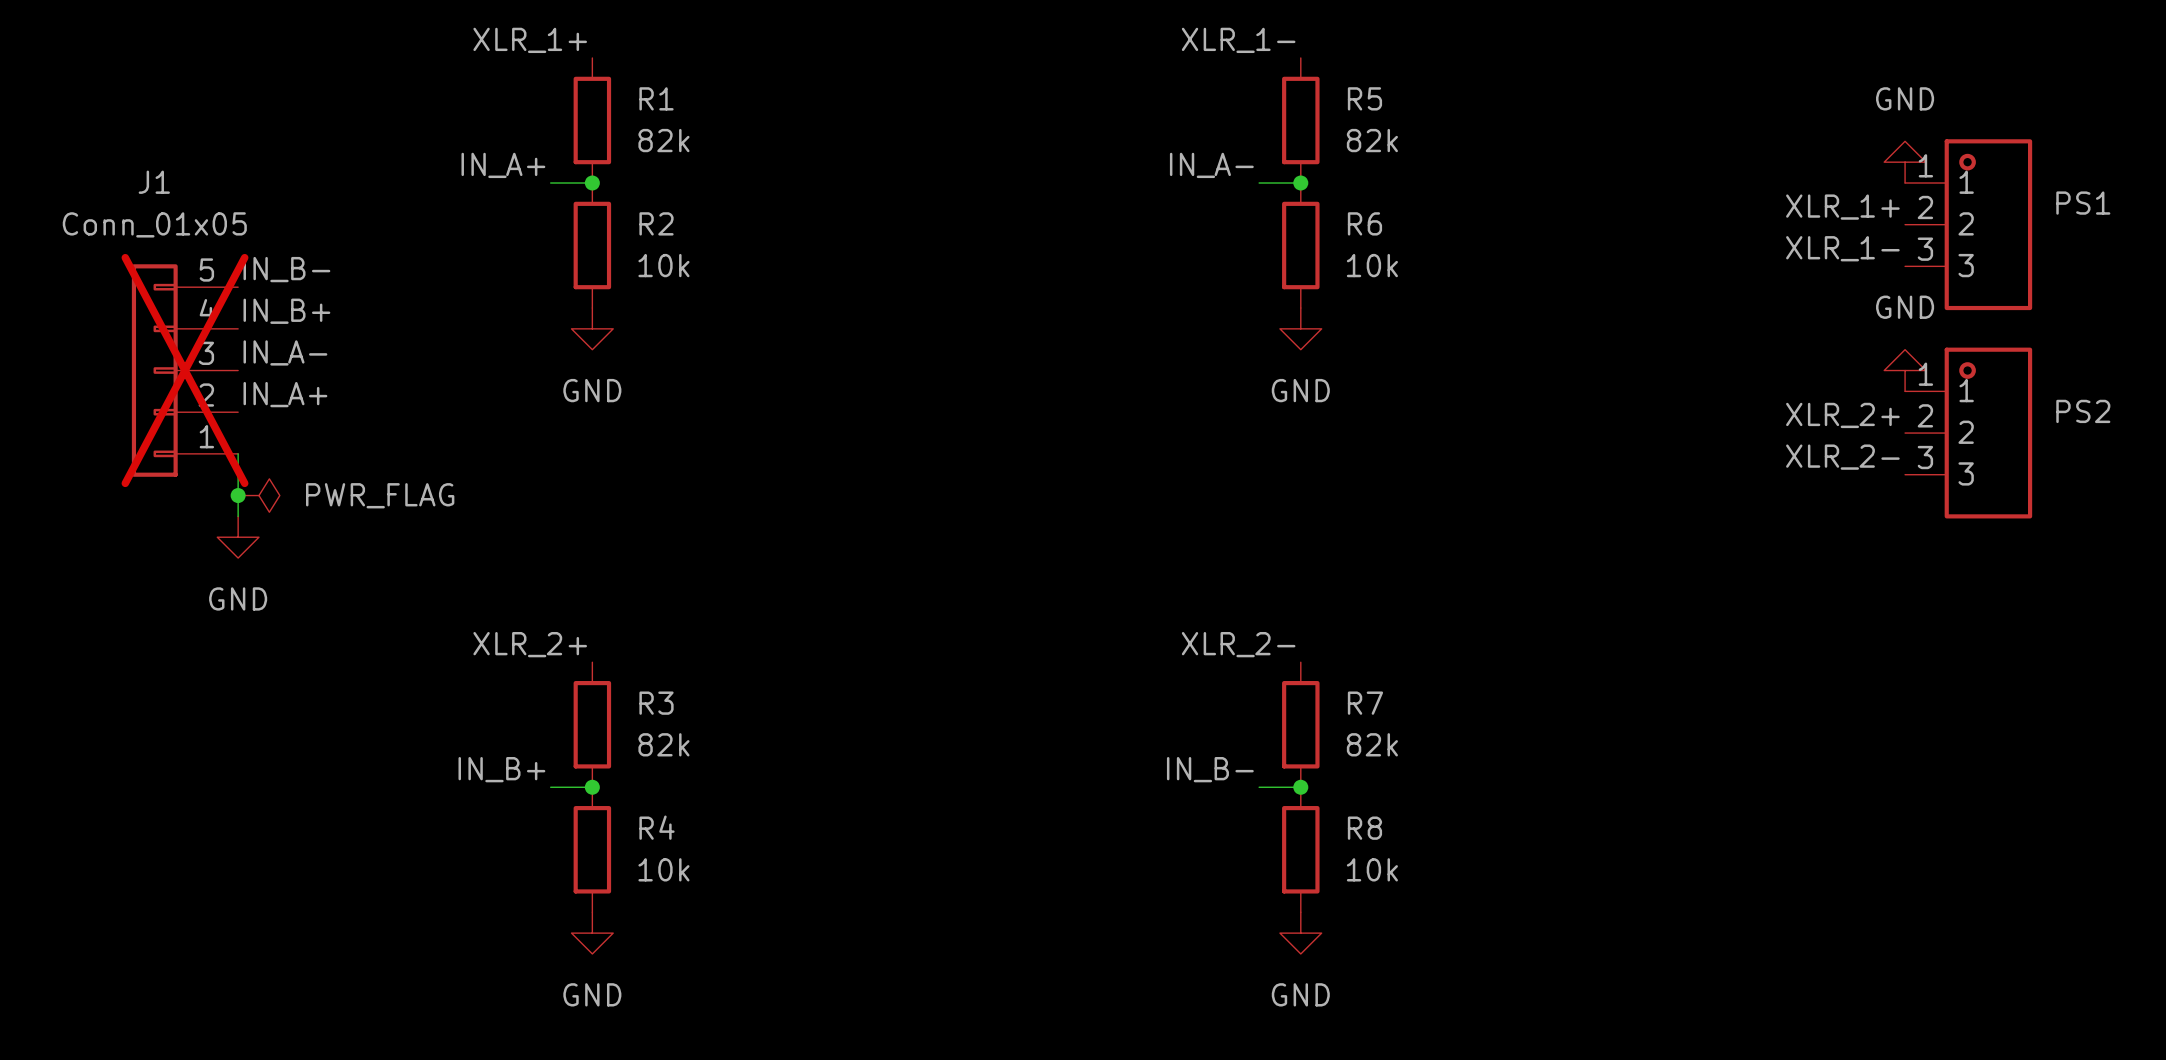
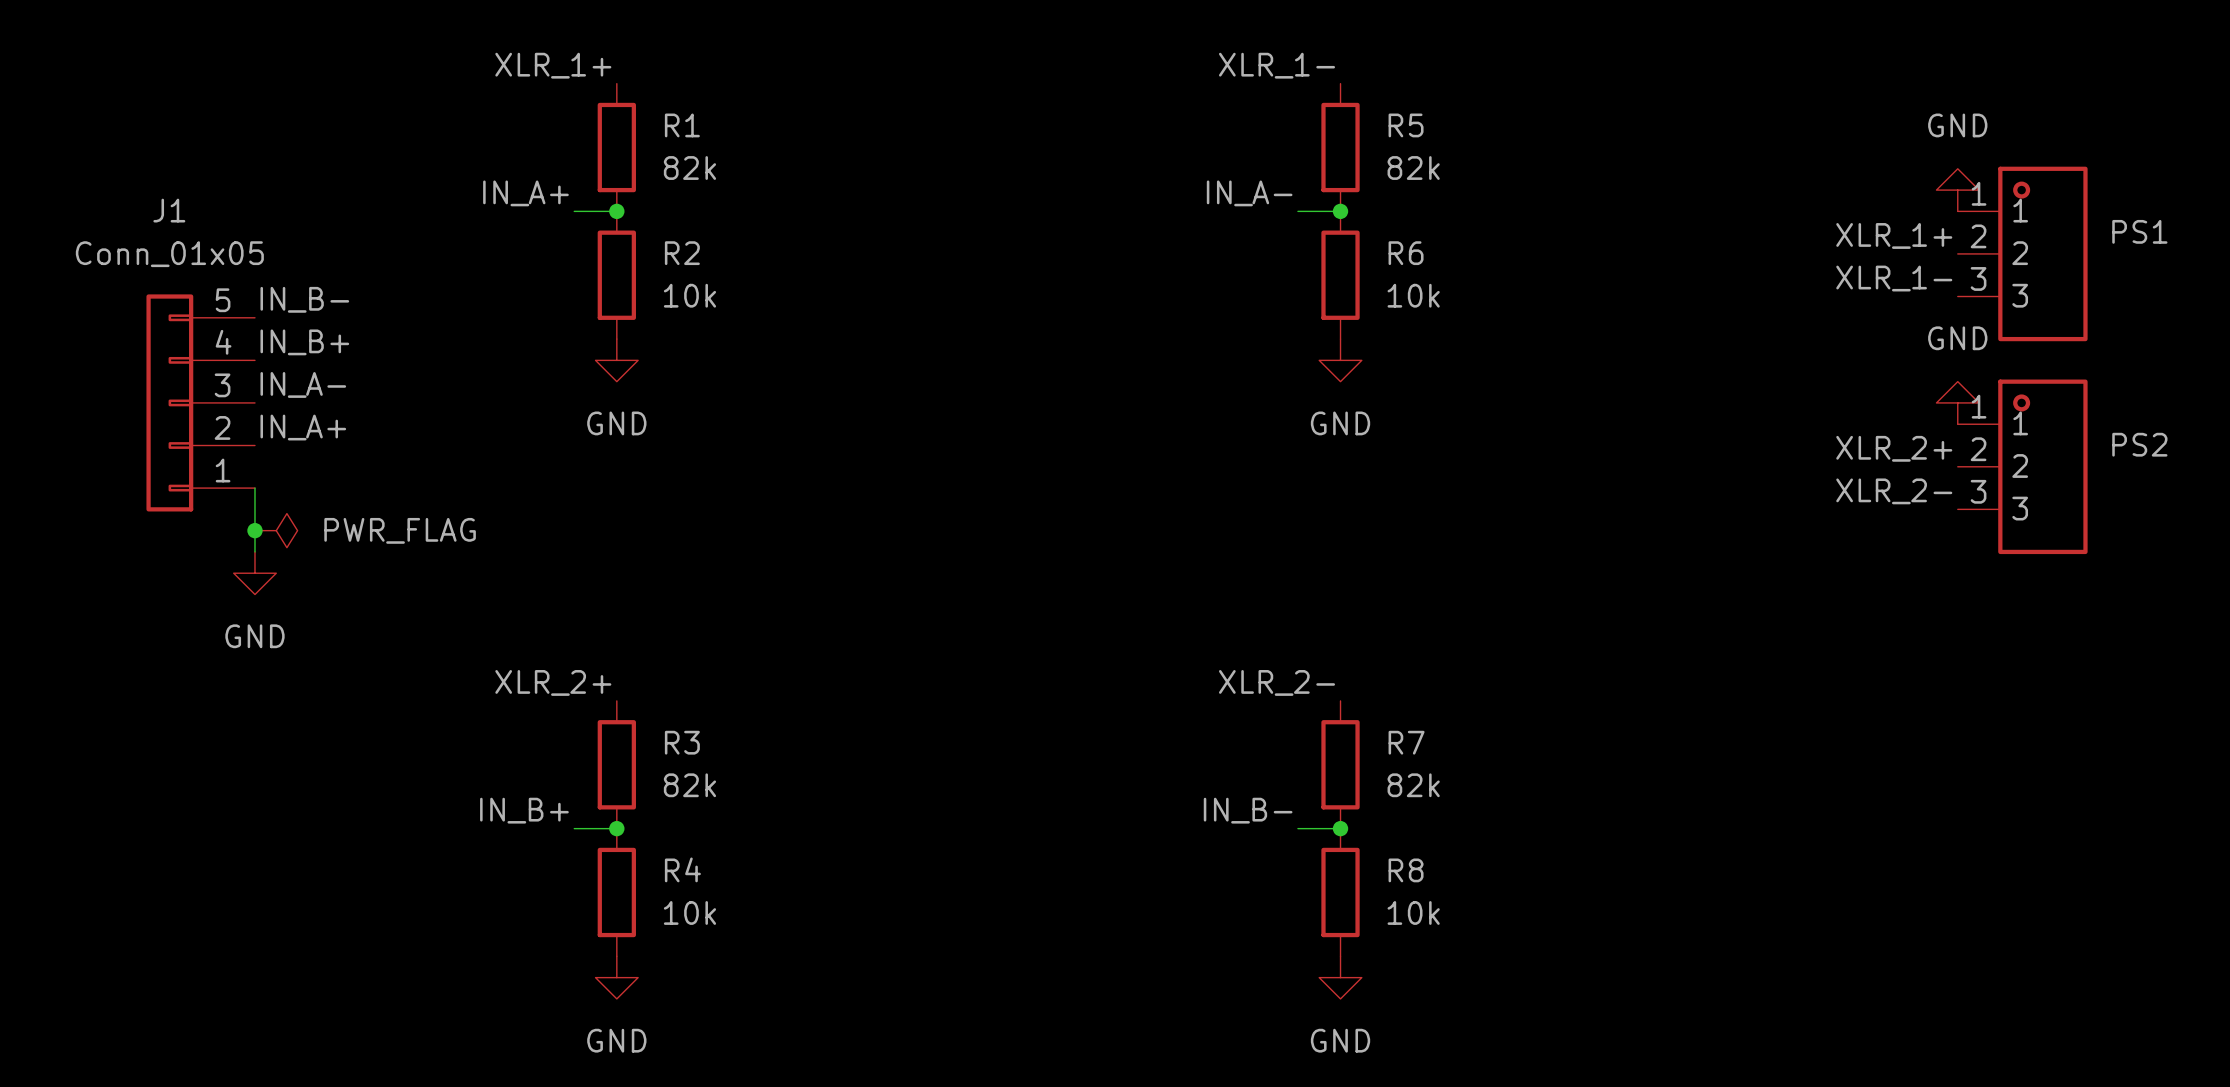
J1 do-not-place cross: (185, 370) -> none

